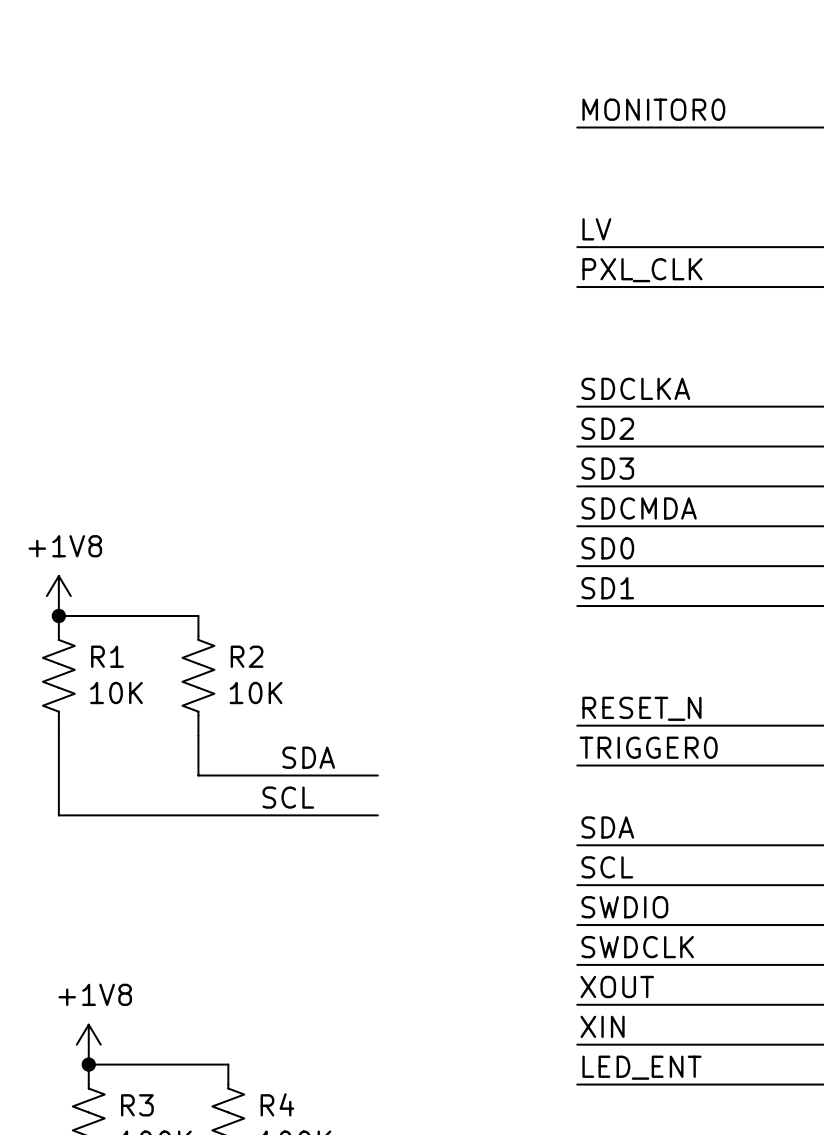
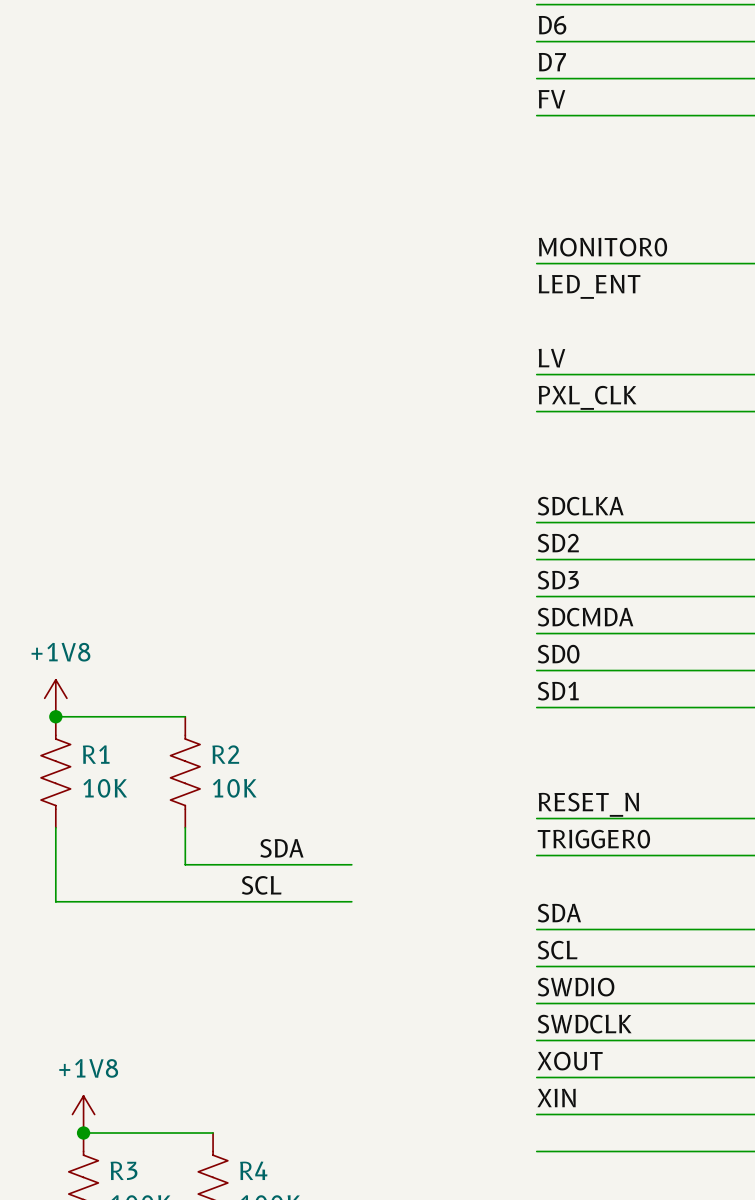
label: none -> LED_ENT (589, 286)
label: LED_ENT (641, 1067) -> none

